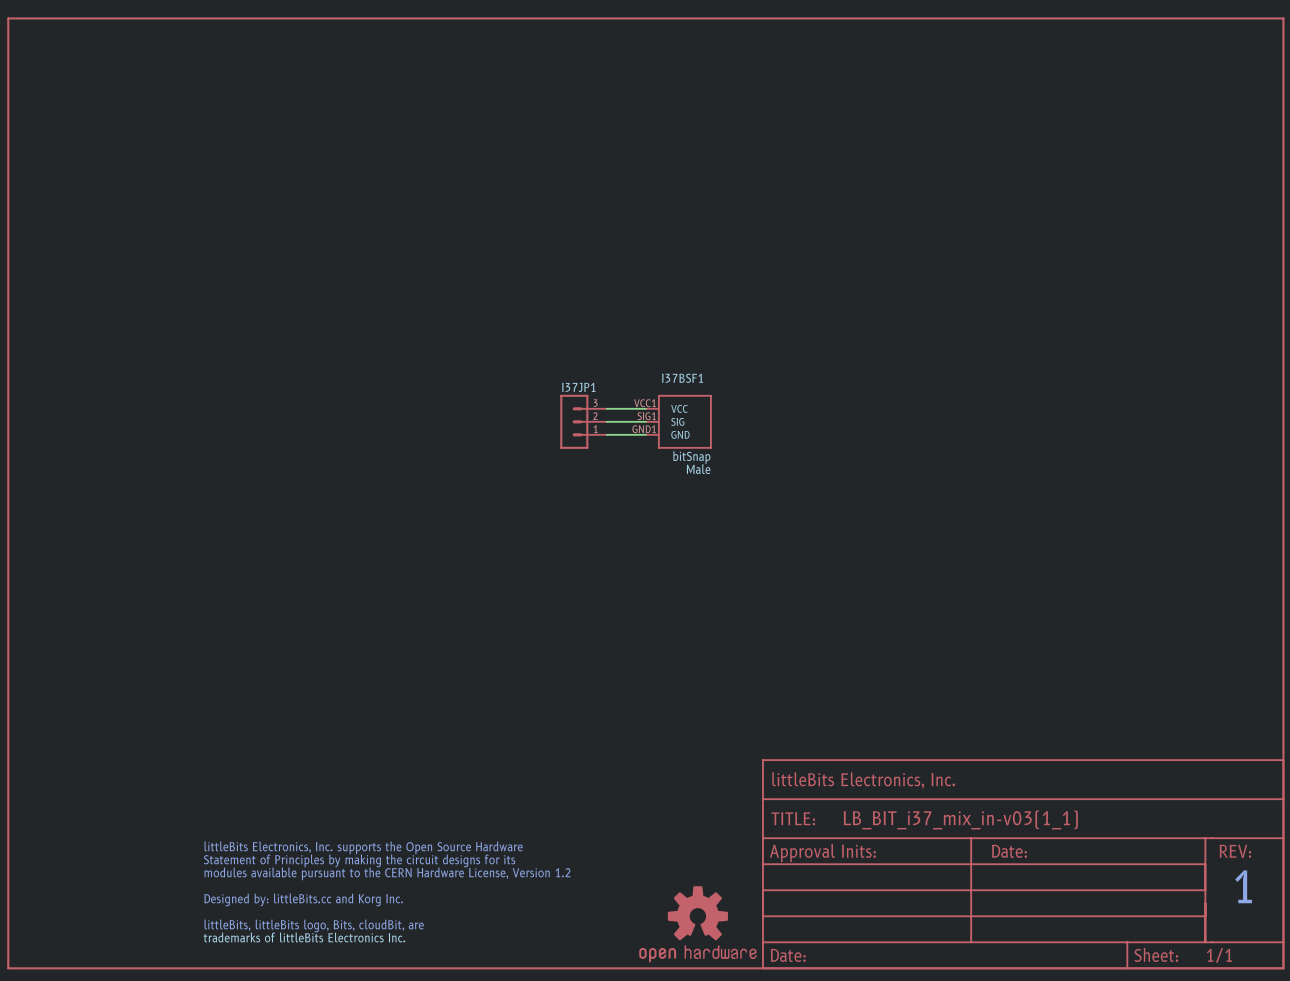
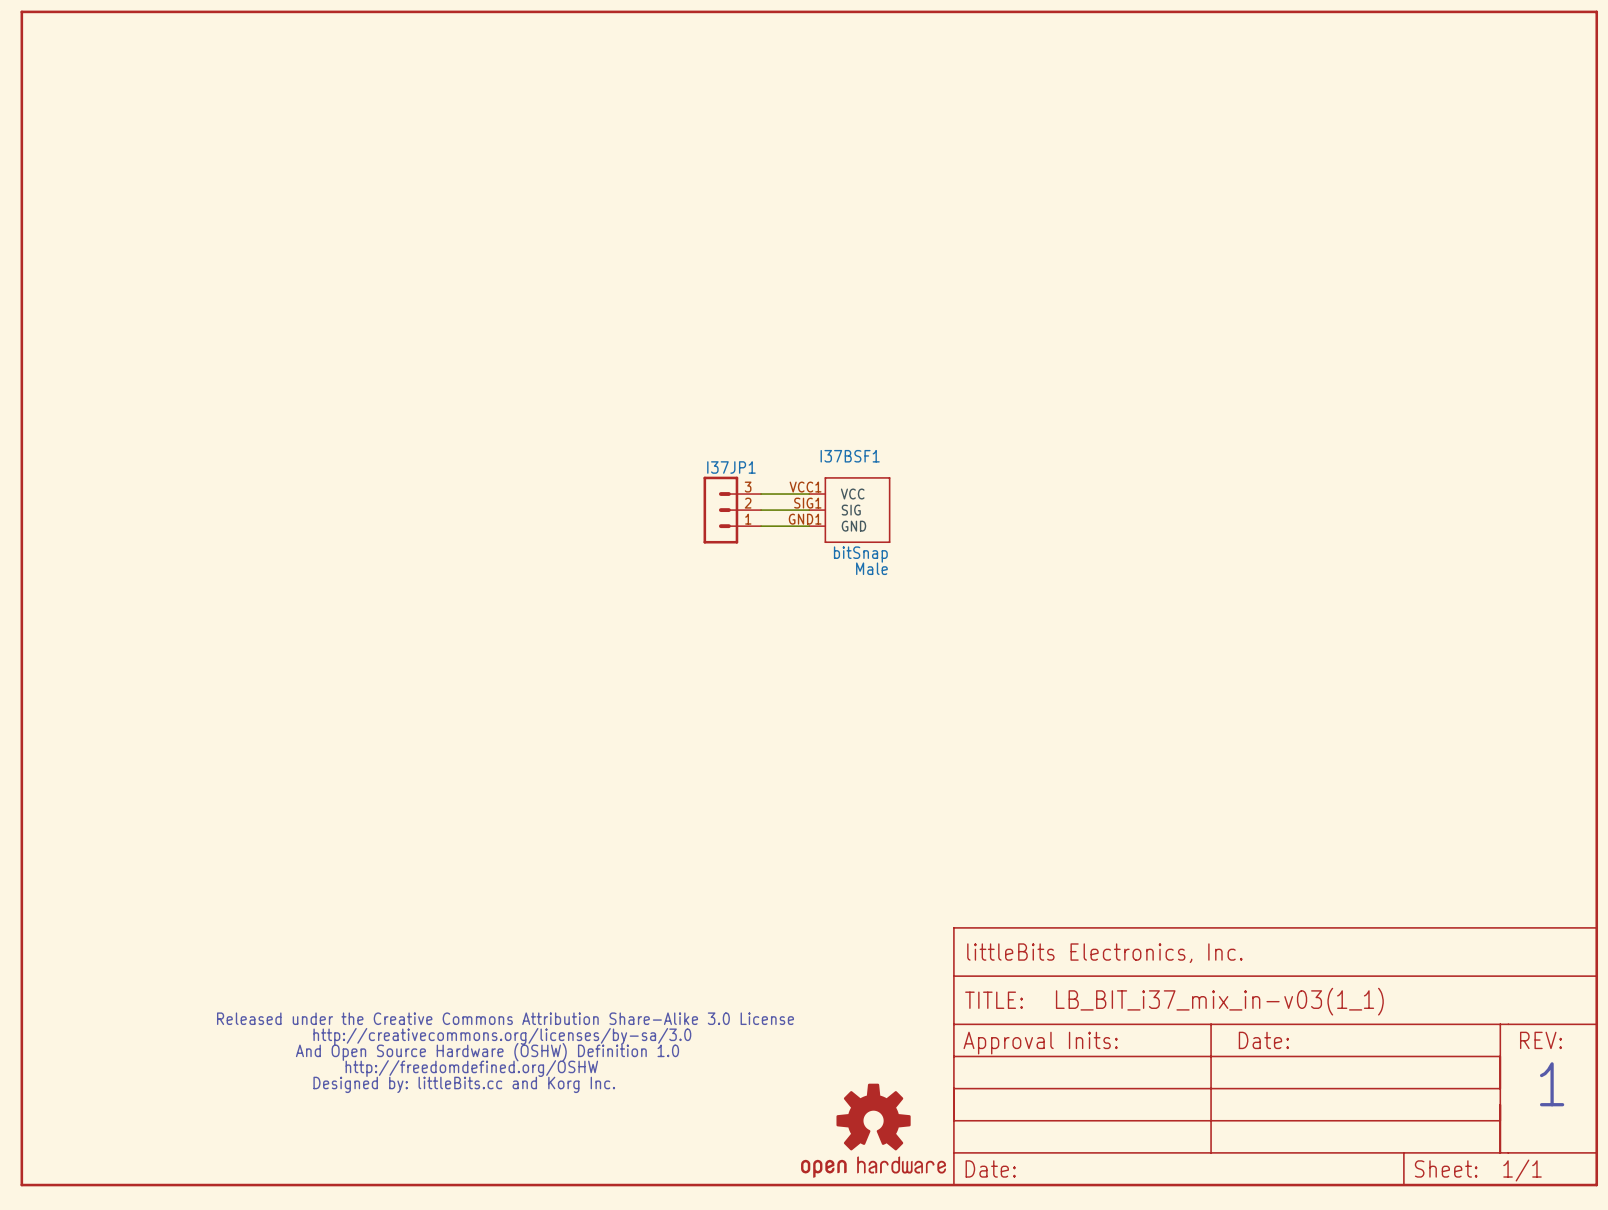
part: none -> (505, 1052)
part: (387, 891) -> none

